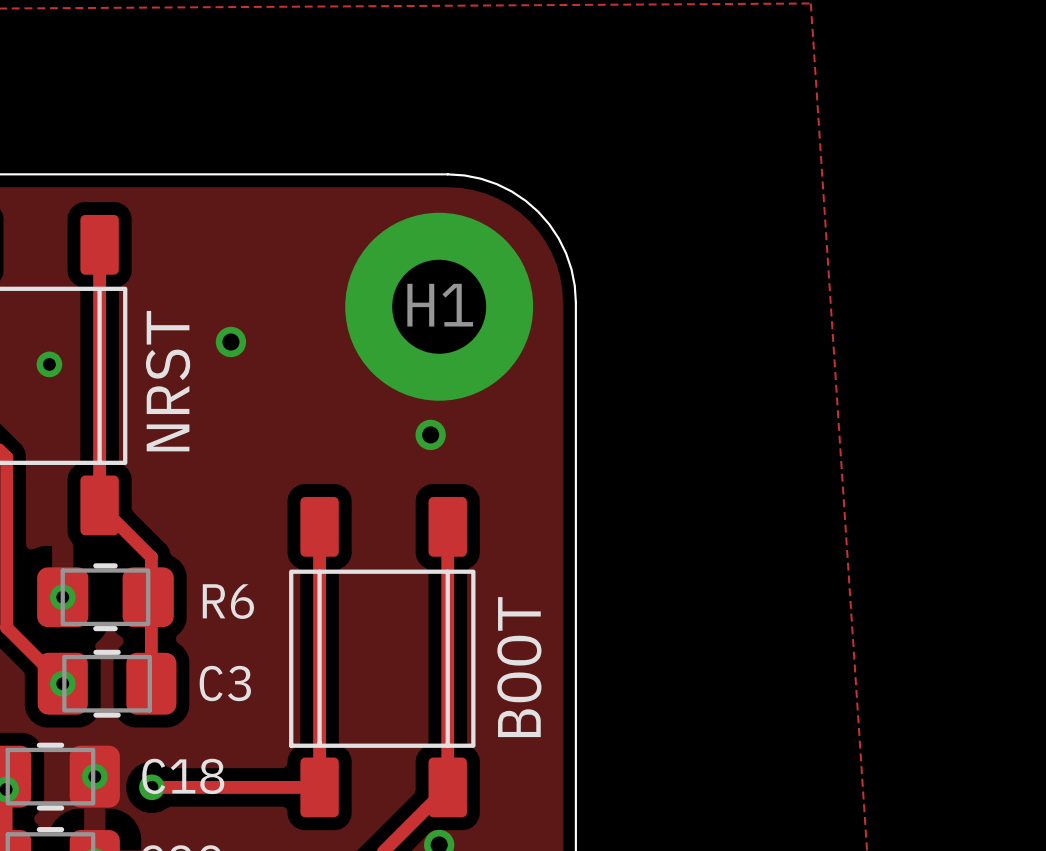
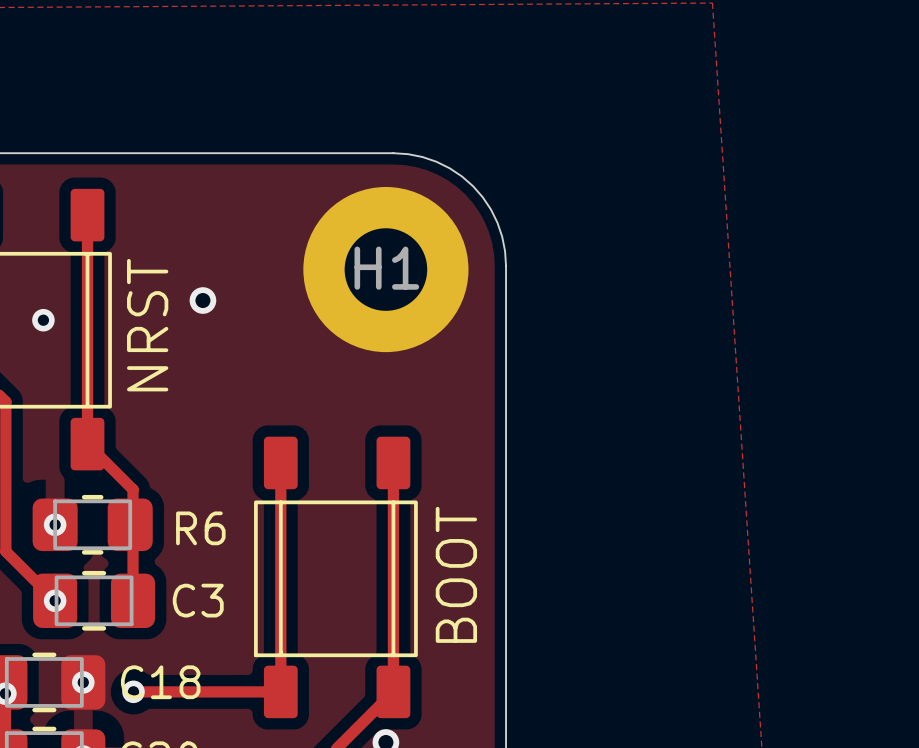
via: (430, 434) -> none

